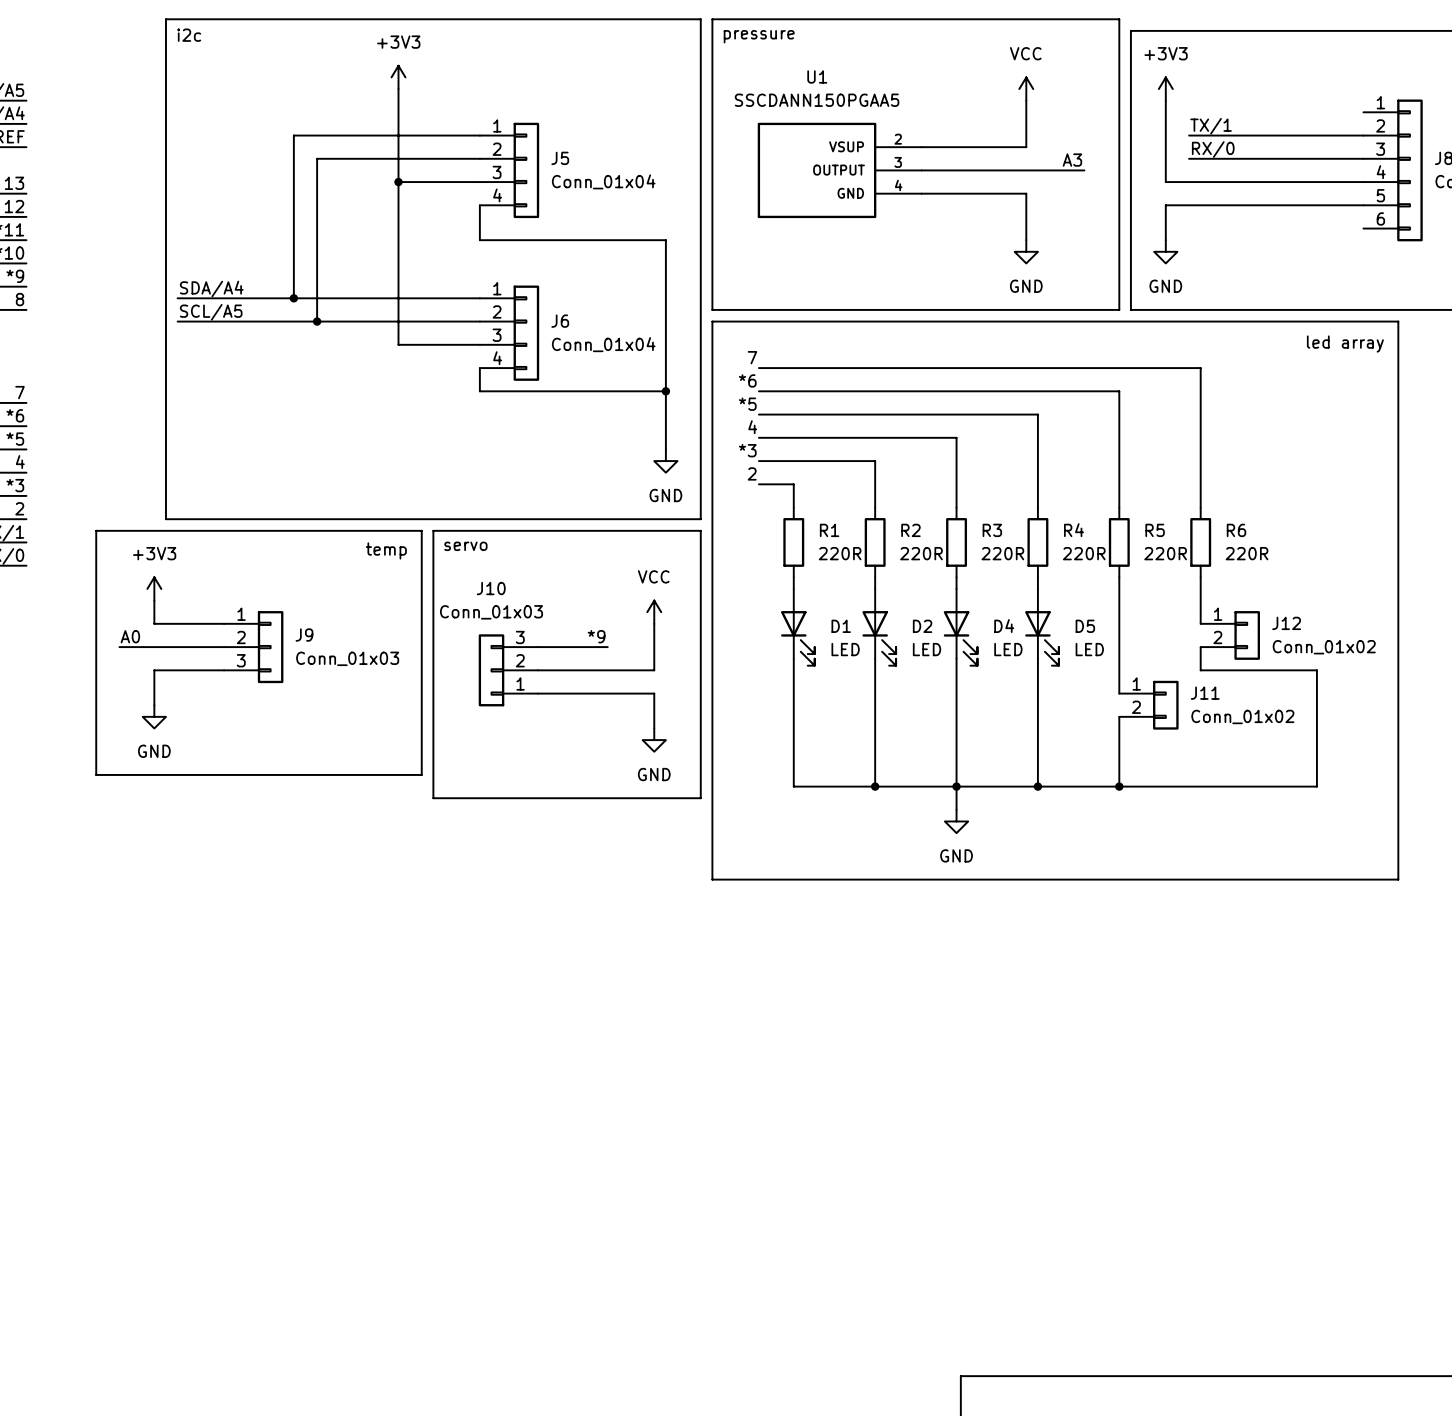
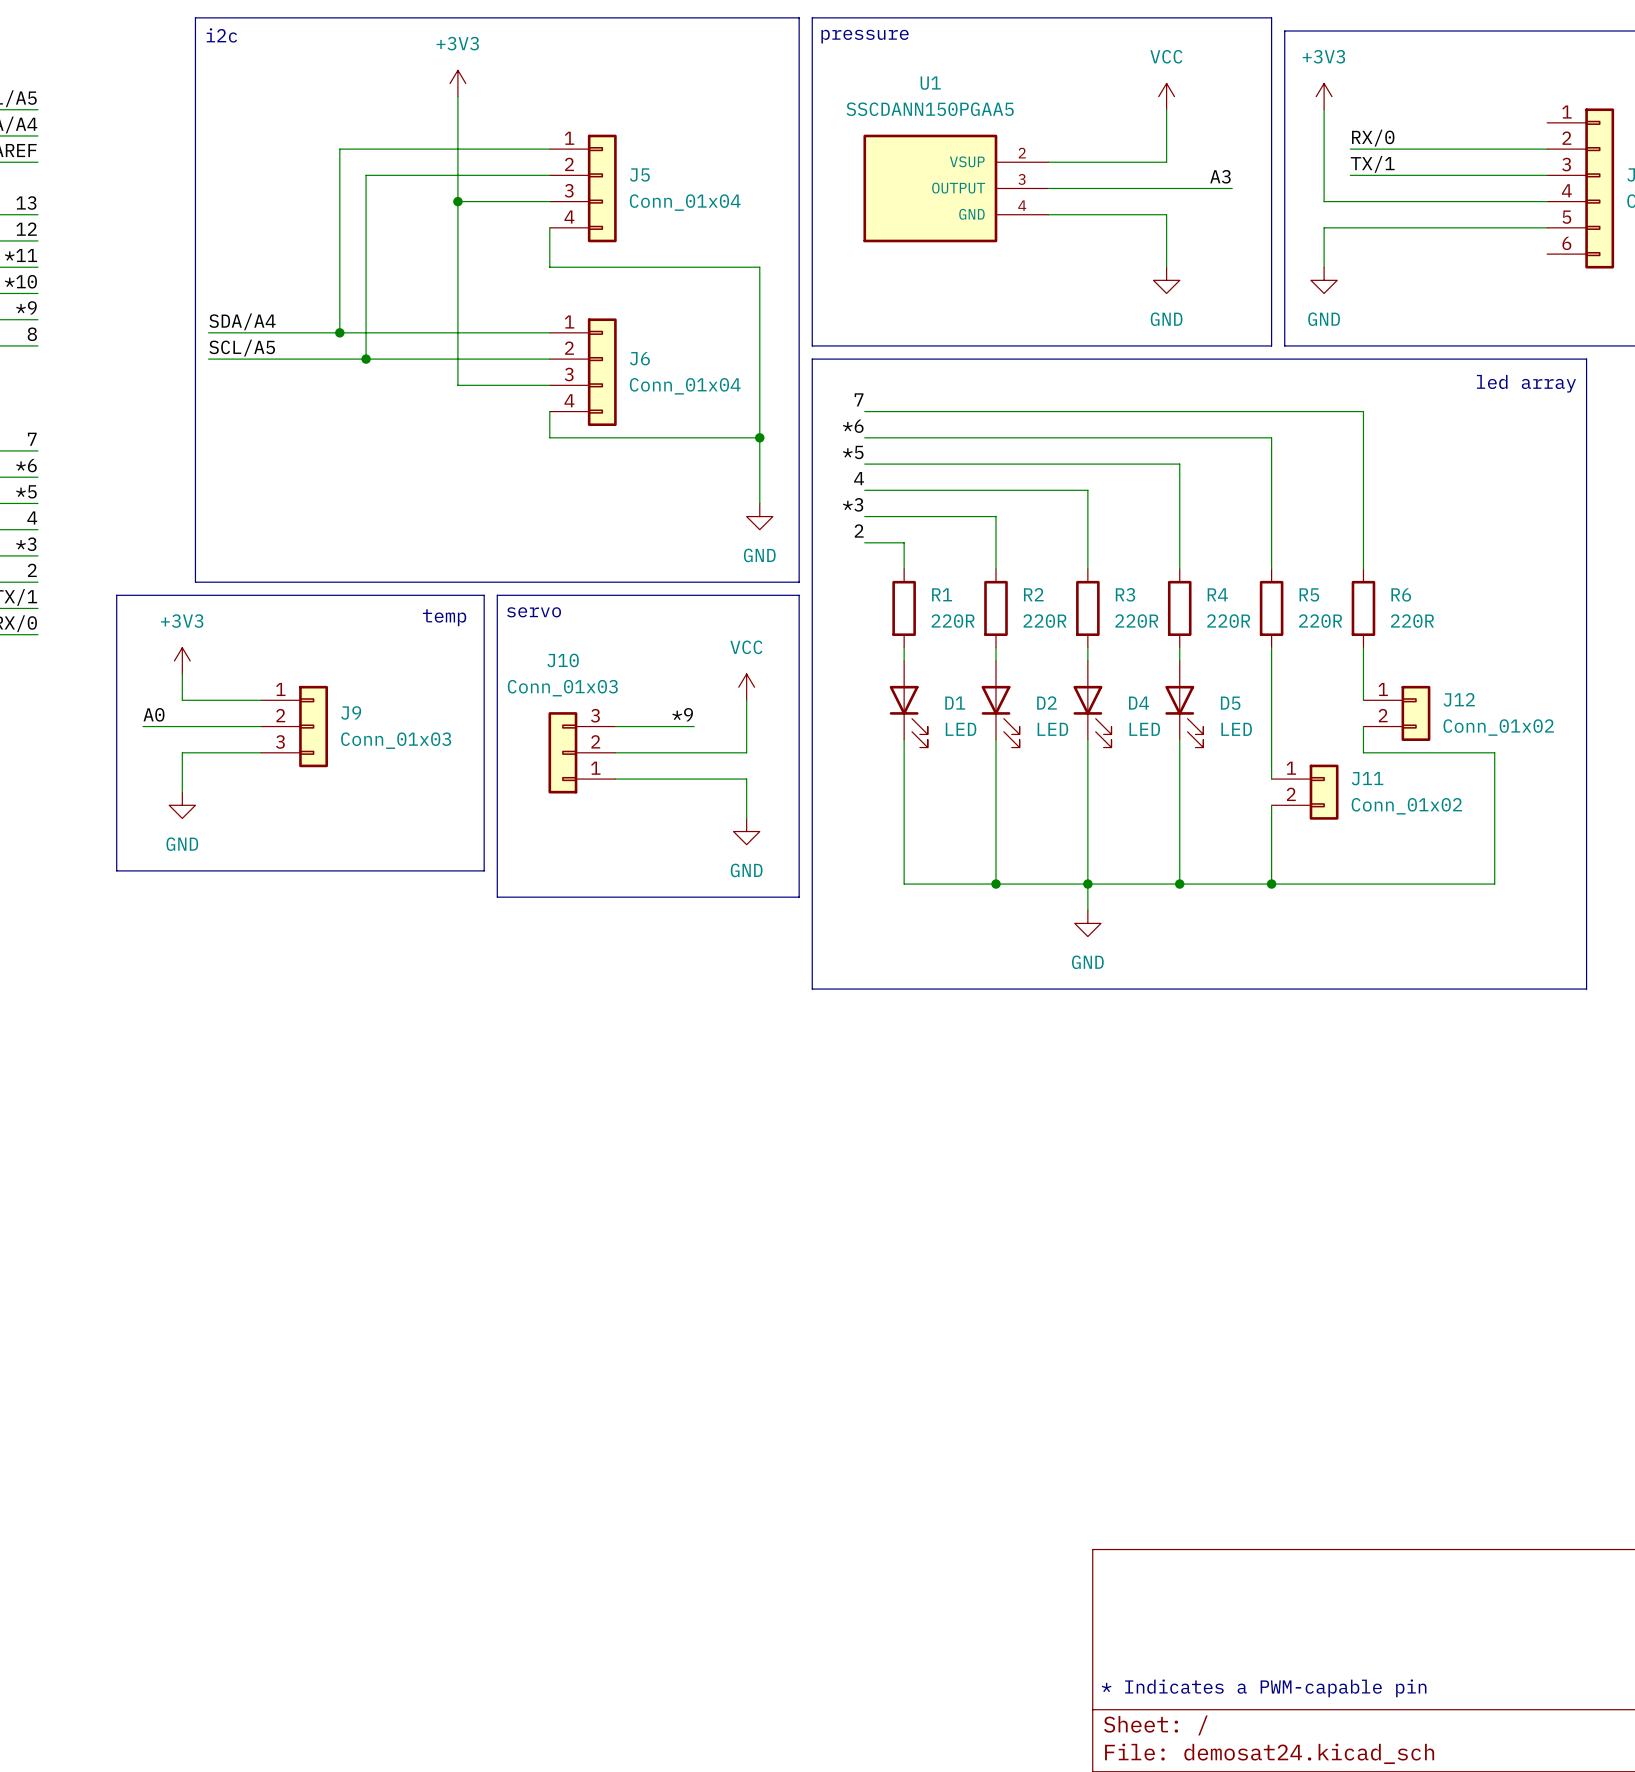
label: TX/1 (1211, 126) -> RX/0 (1373, 138)
label: RX/0 (1213, 149) -> TX/1 (1372, 164)

